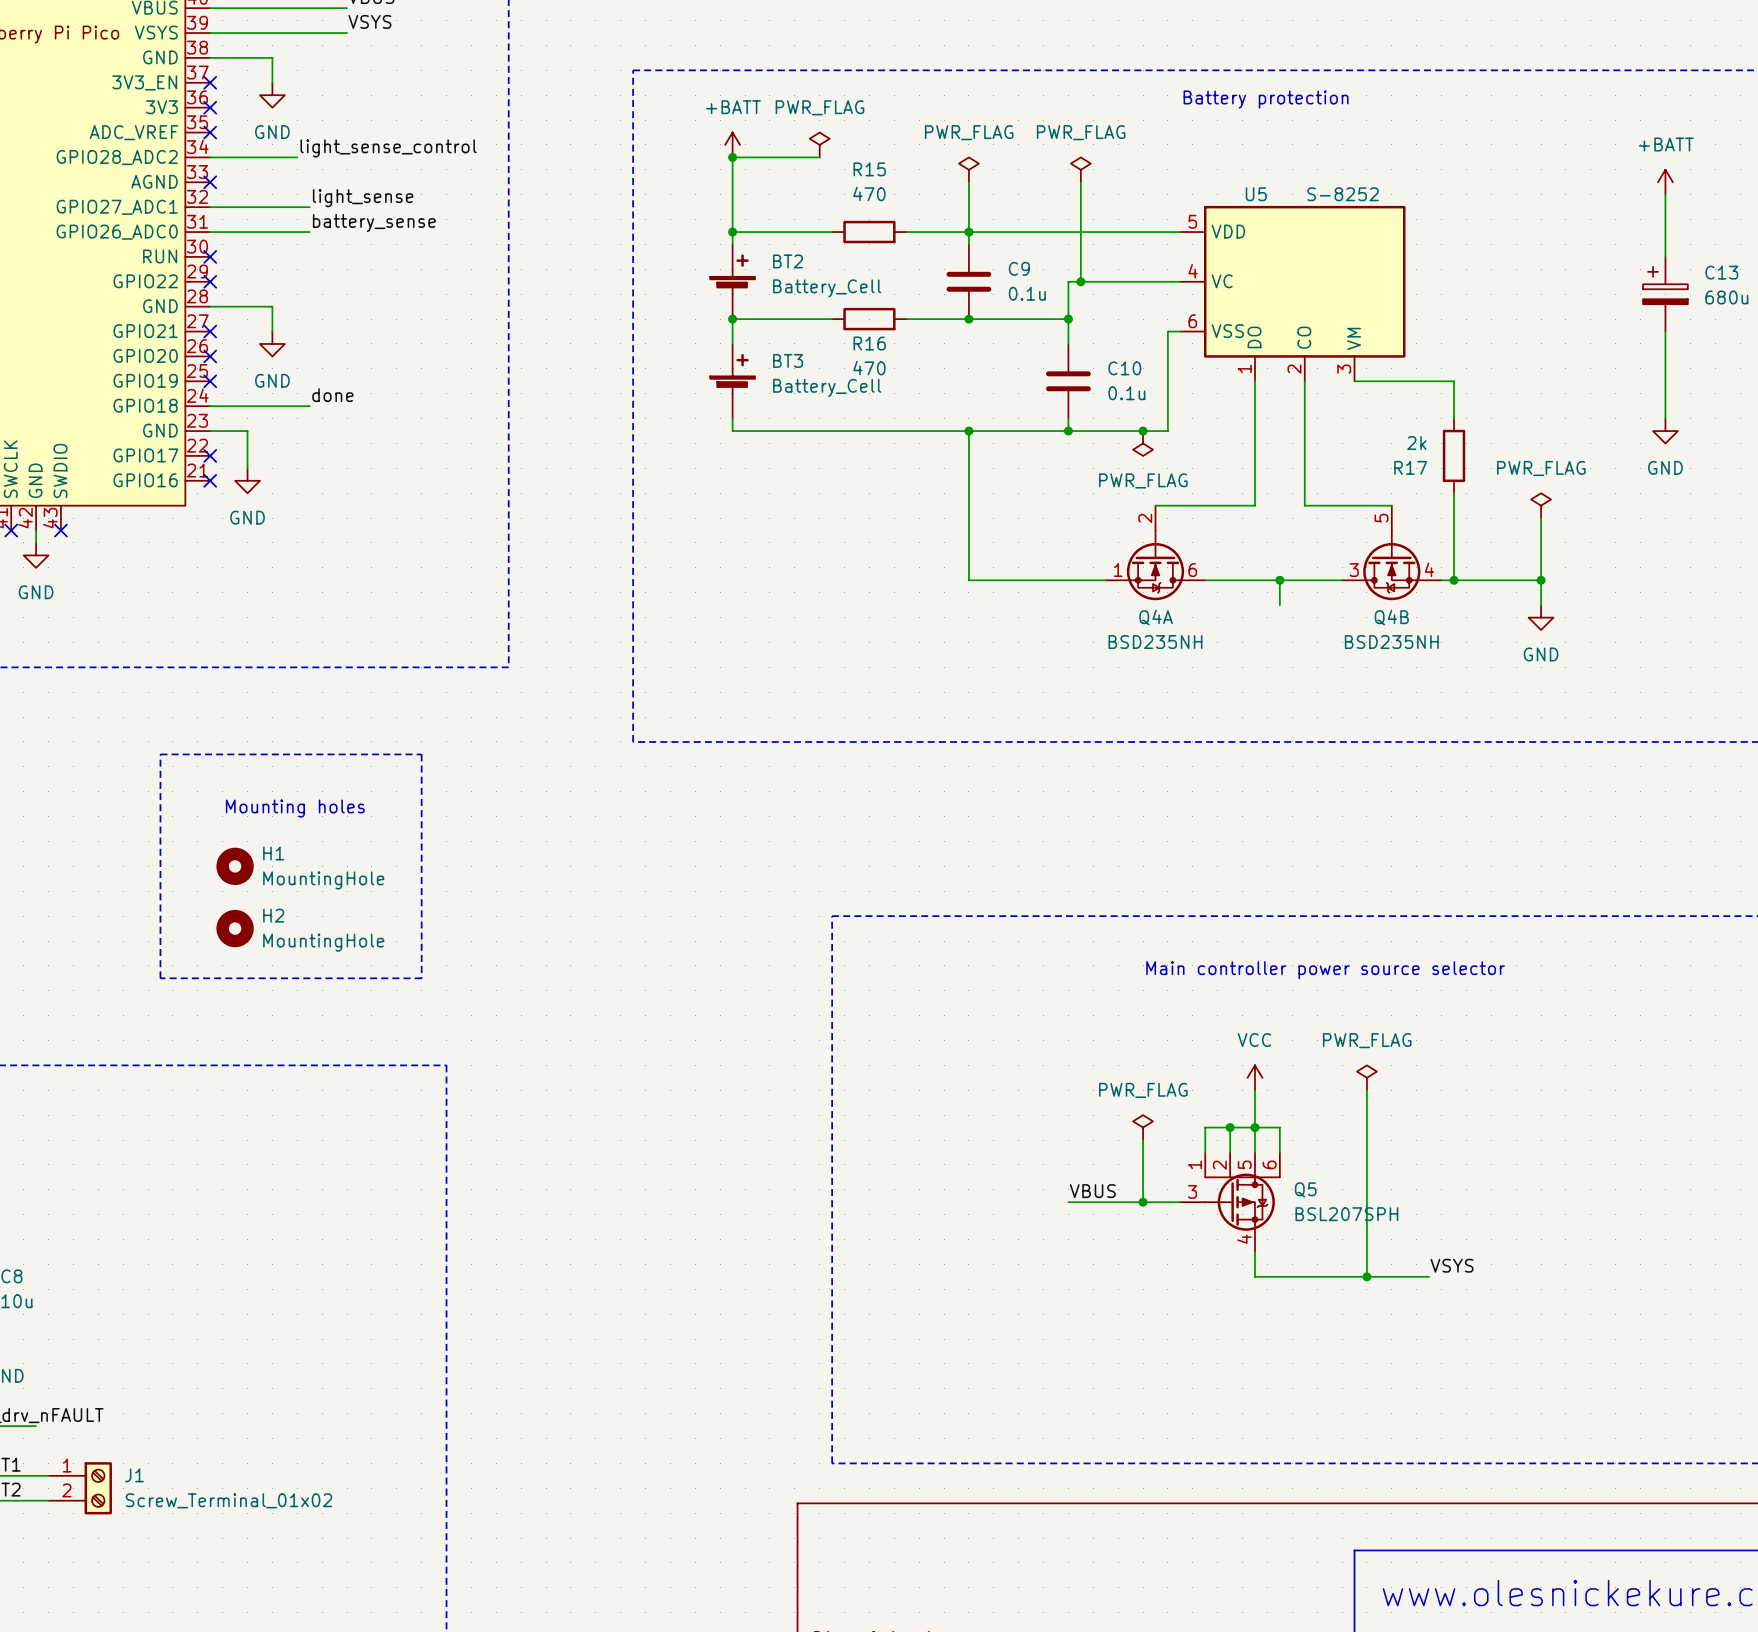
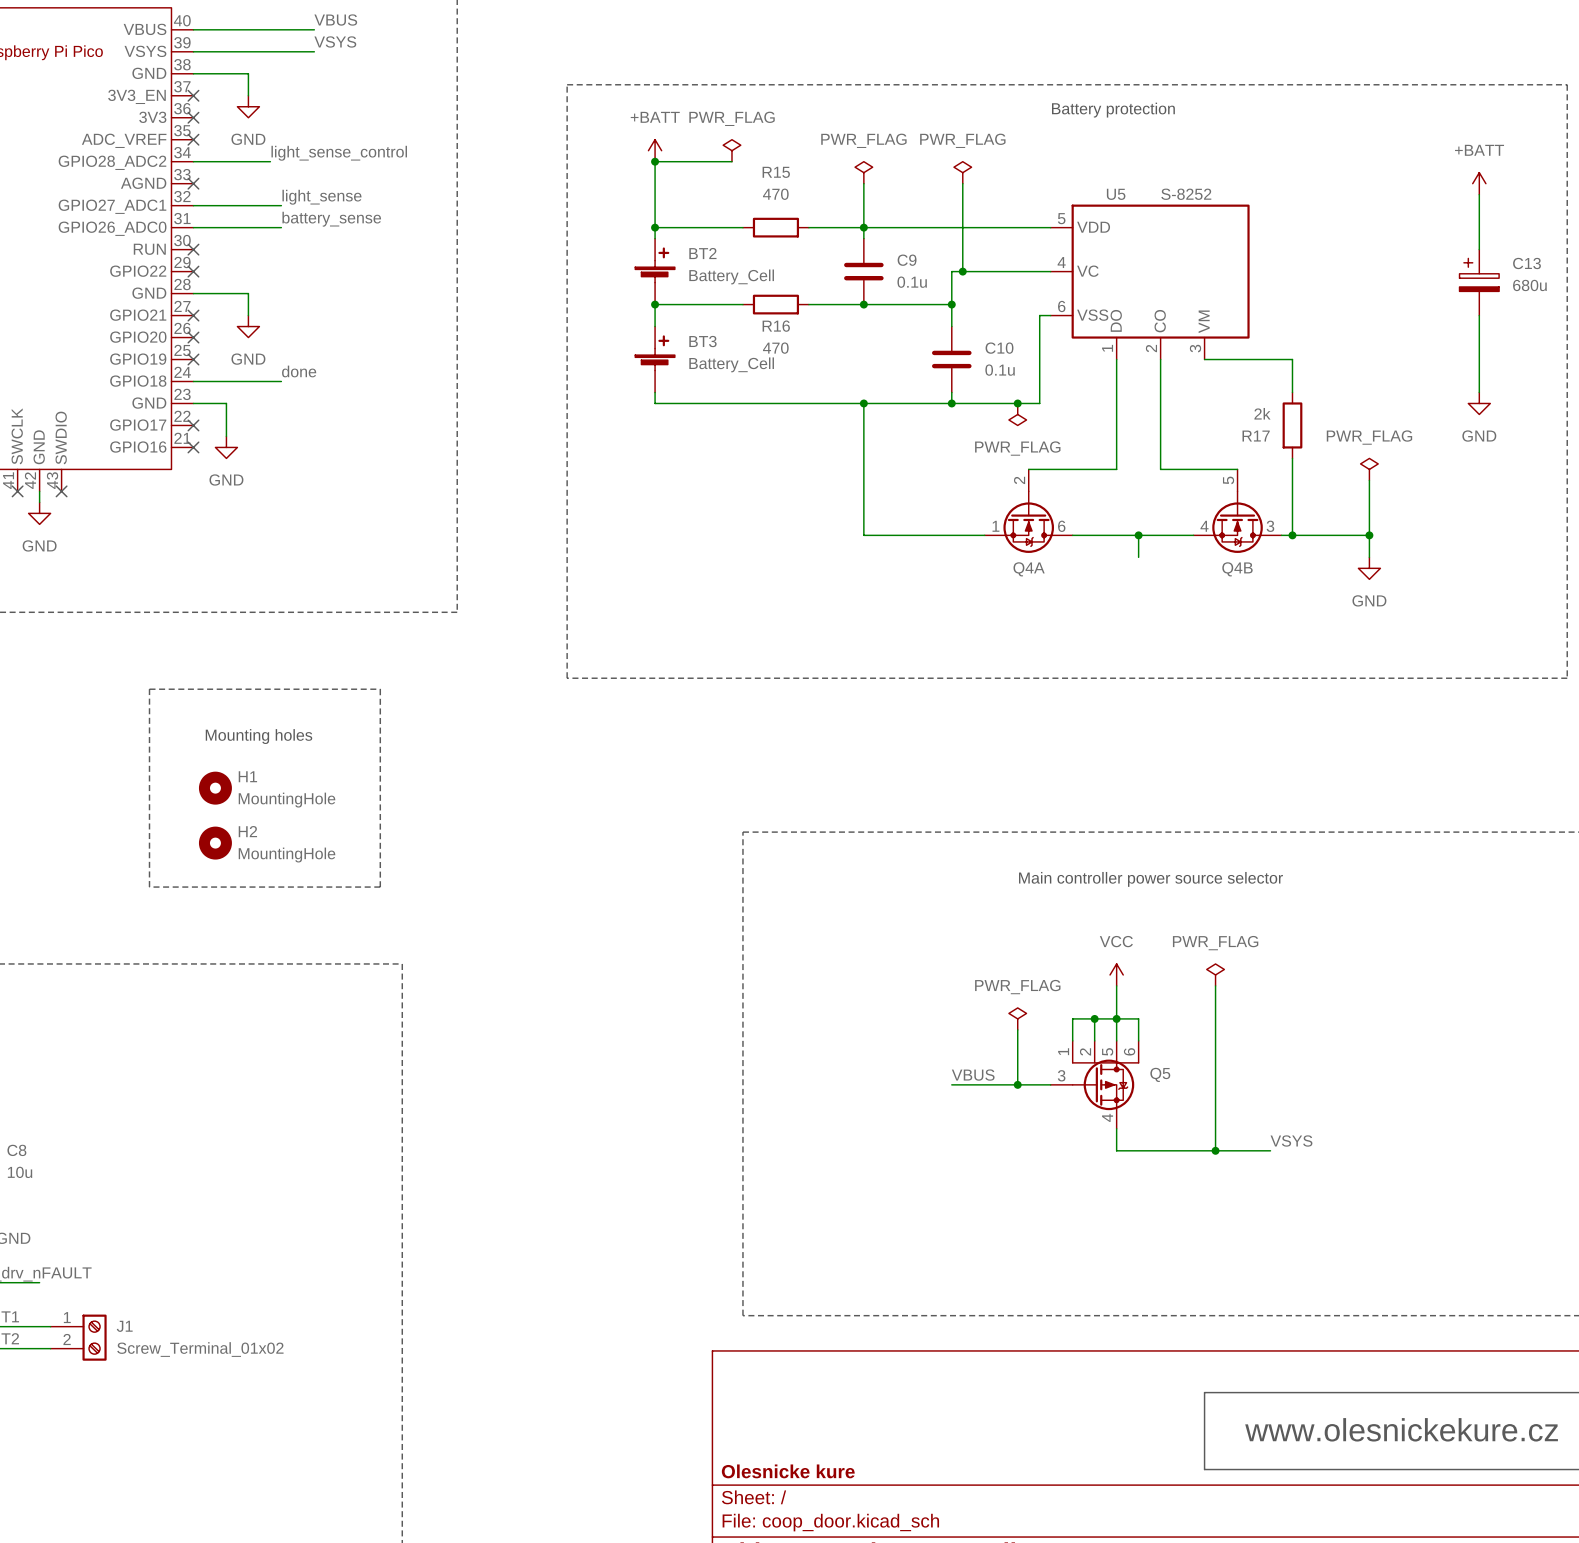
Q4B flip: as is (1391, 565) -> left-right (1237, 522)
Q4A value: BSD235NH (1155, 642) -> none
Q4B value: BSD235NH (1391, 642) -> none
Q5 value: BSL207SPH (1346, 1214) -> none

